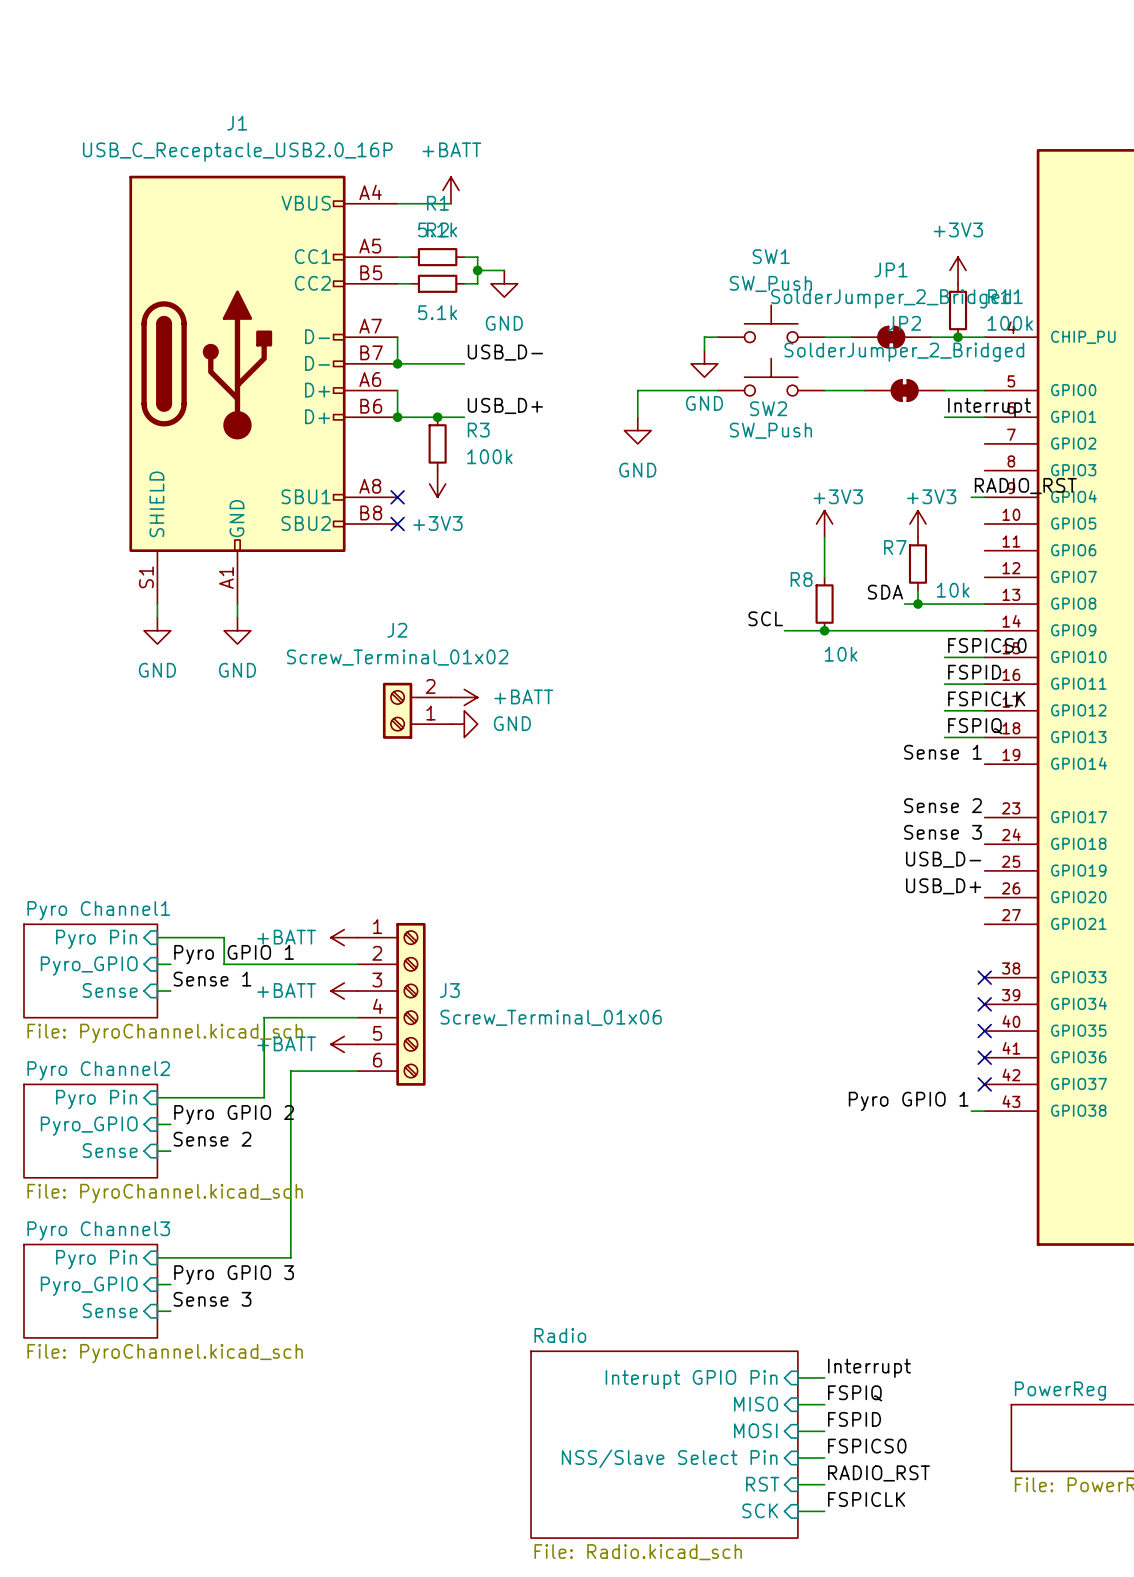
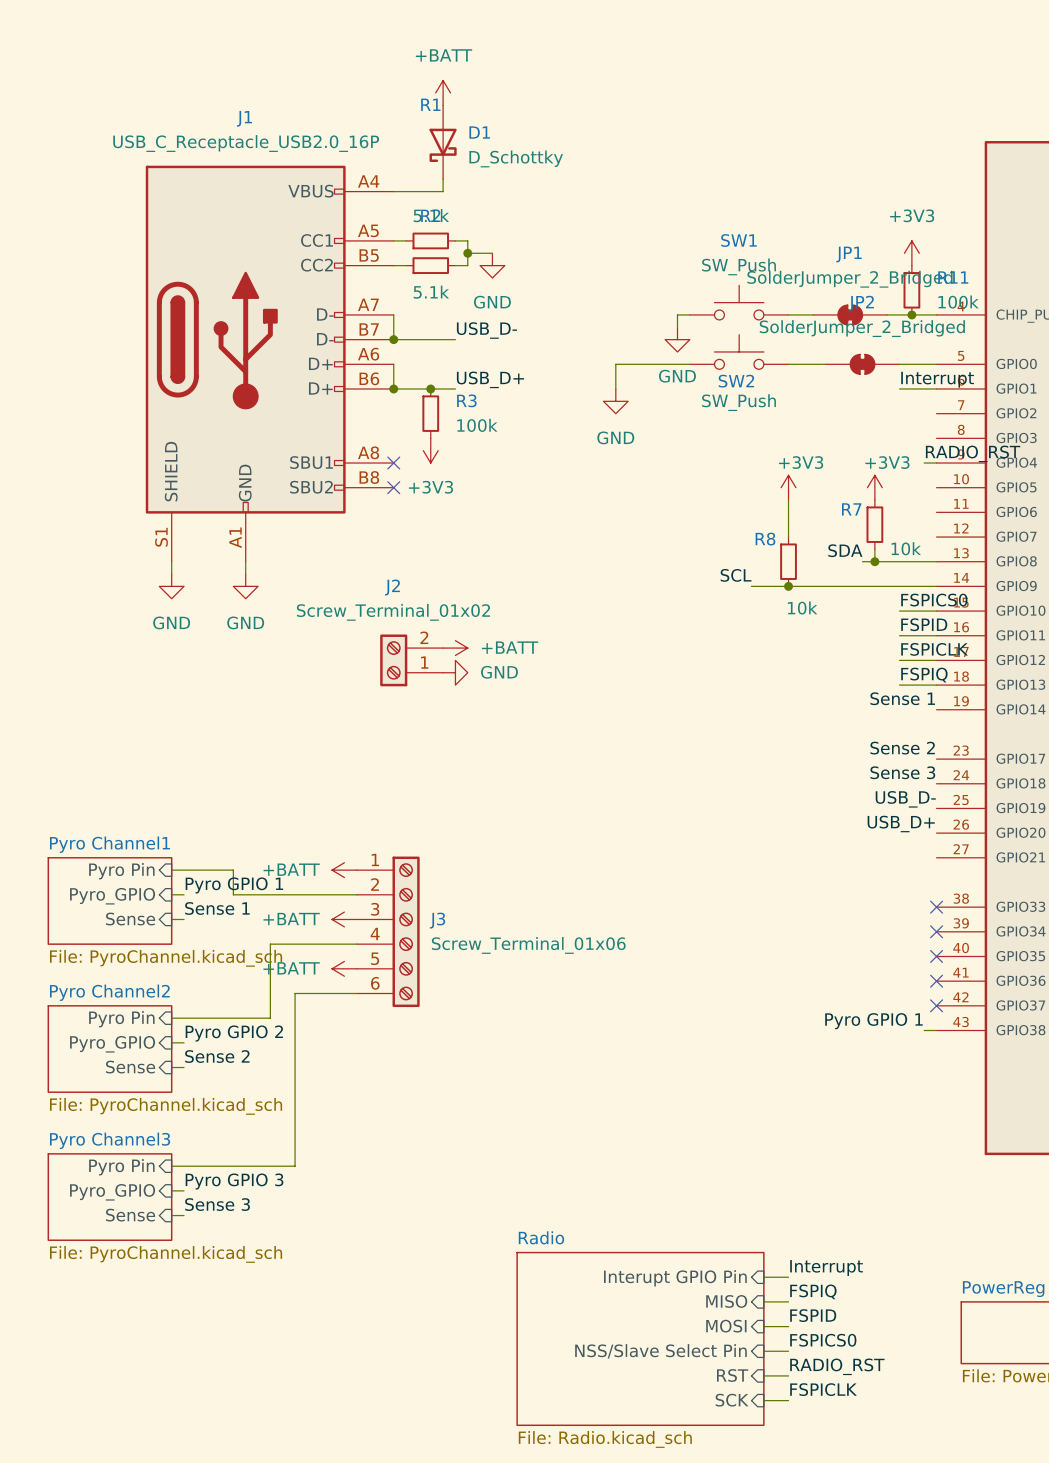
D1: none -> D_Schottky (443, 142)
power symbol position: +BATT (450, 190) -> +BATT (443, 92)
R1 name position: R1 (437, 203) -> R1 (430, 104)

